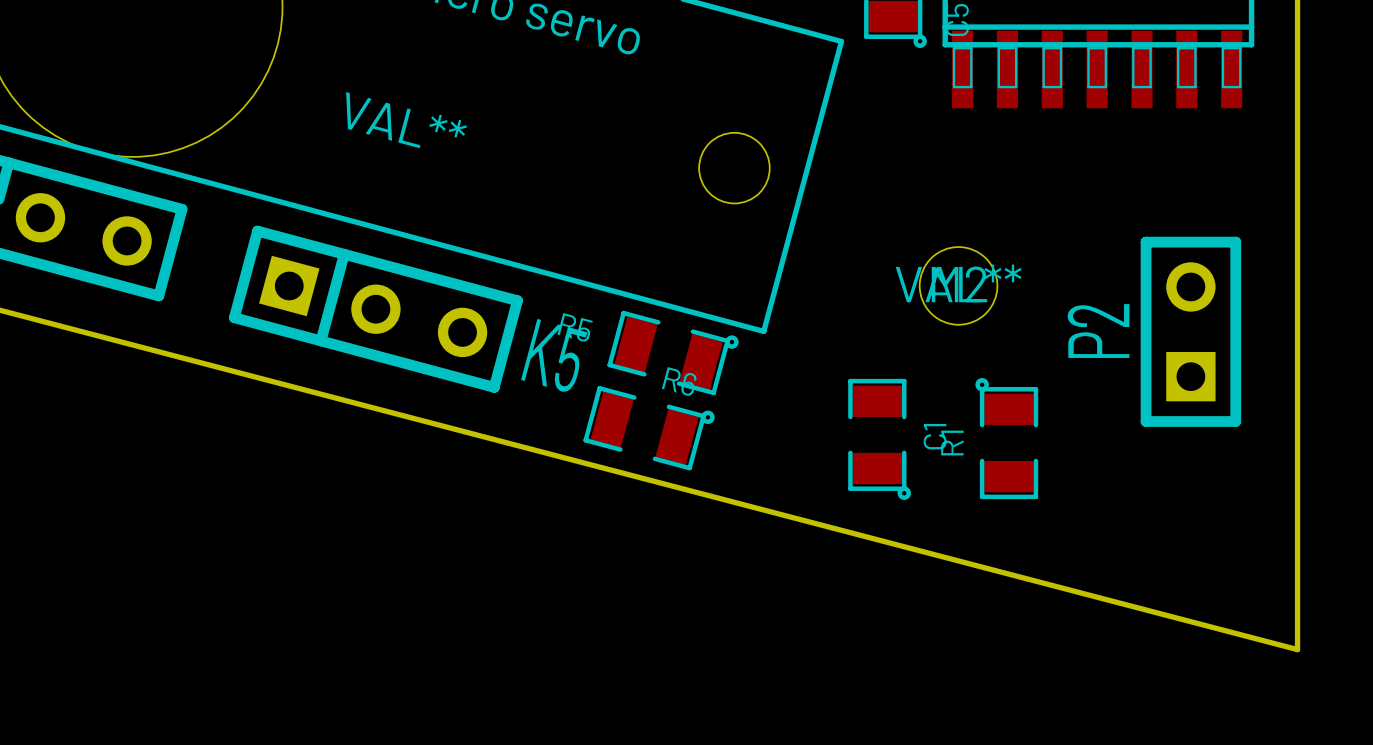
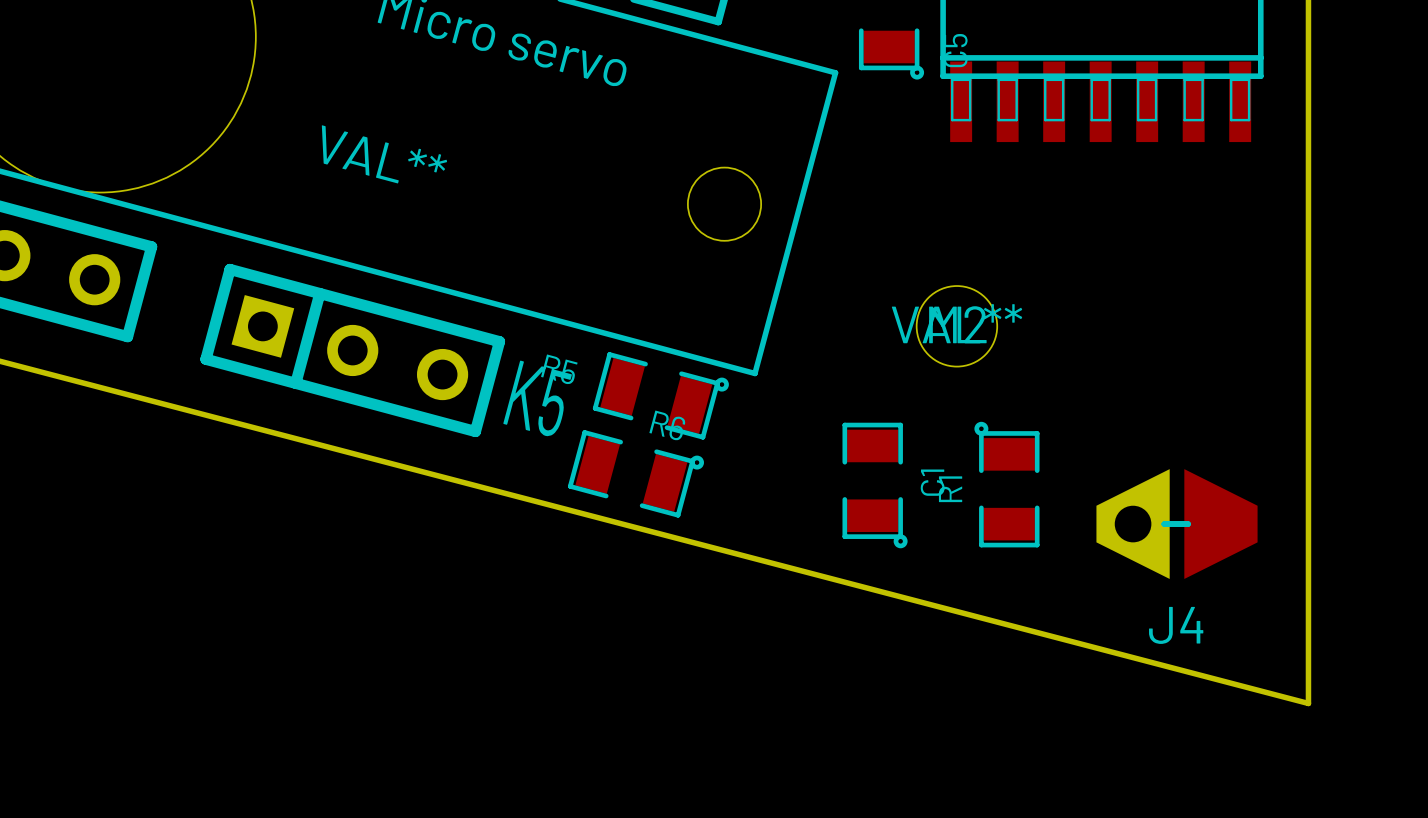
P2: (1190, 331) -> none
J4: none -> (1177, 524)

